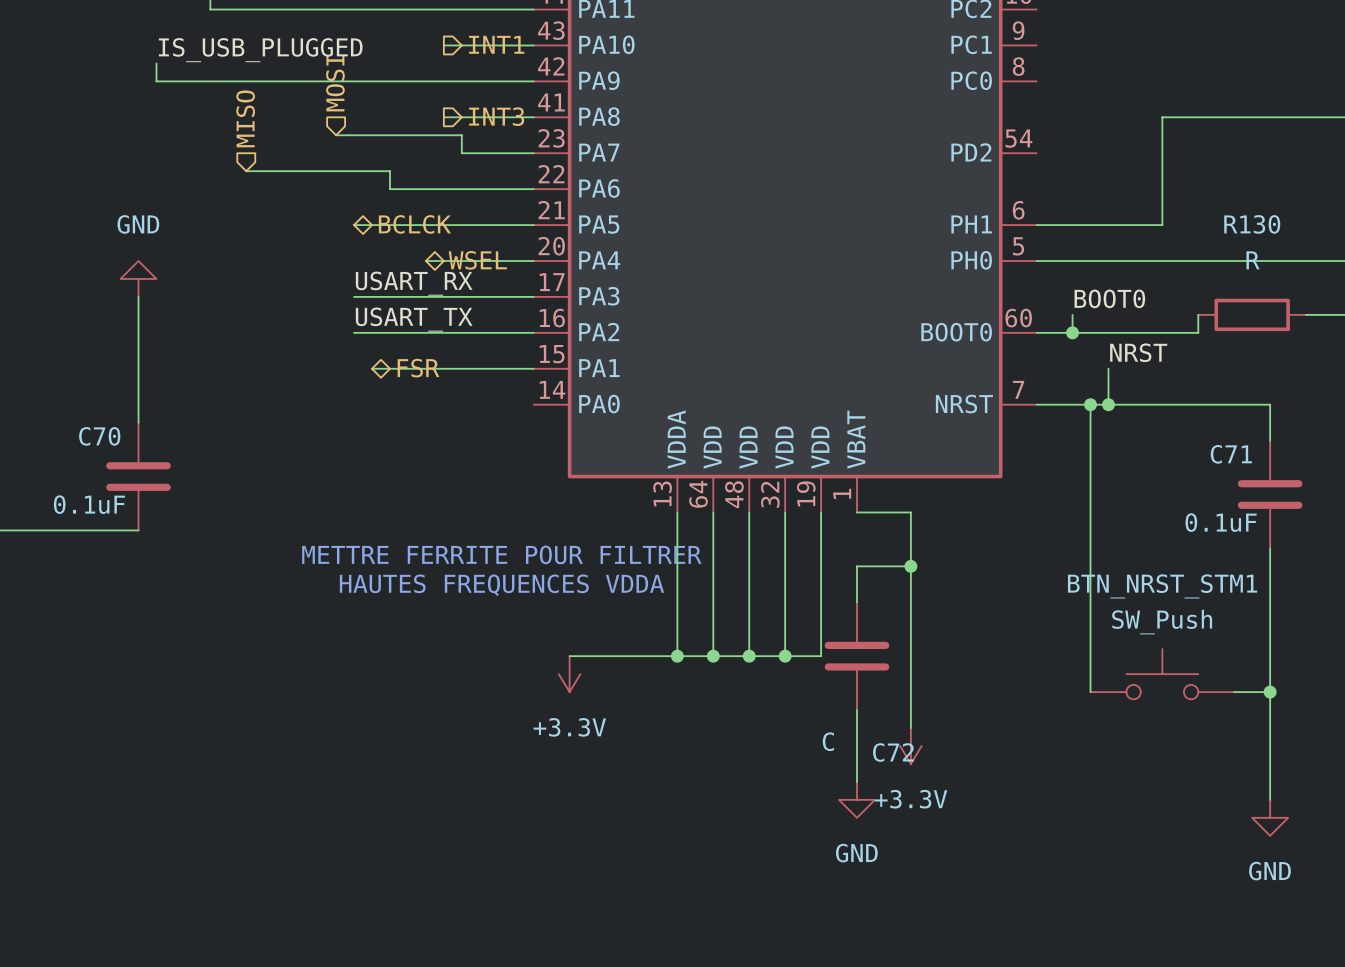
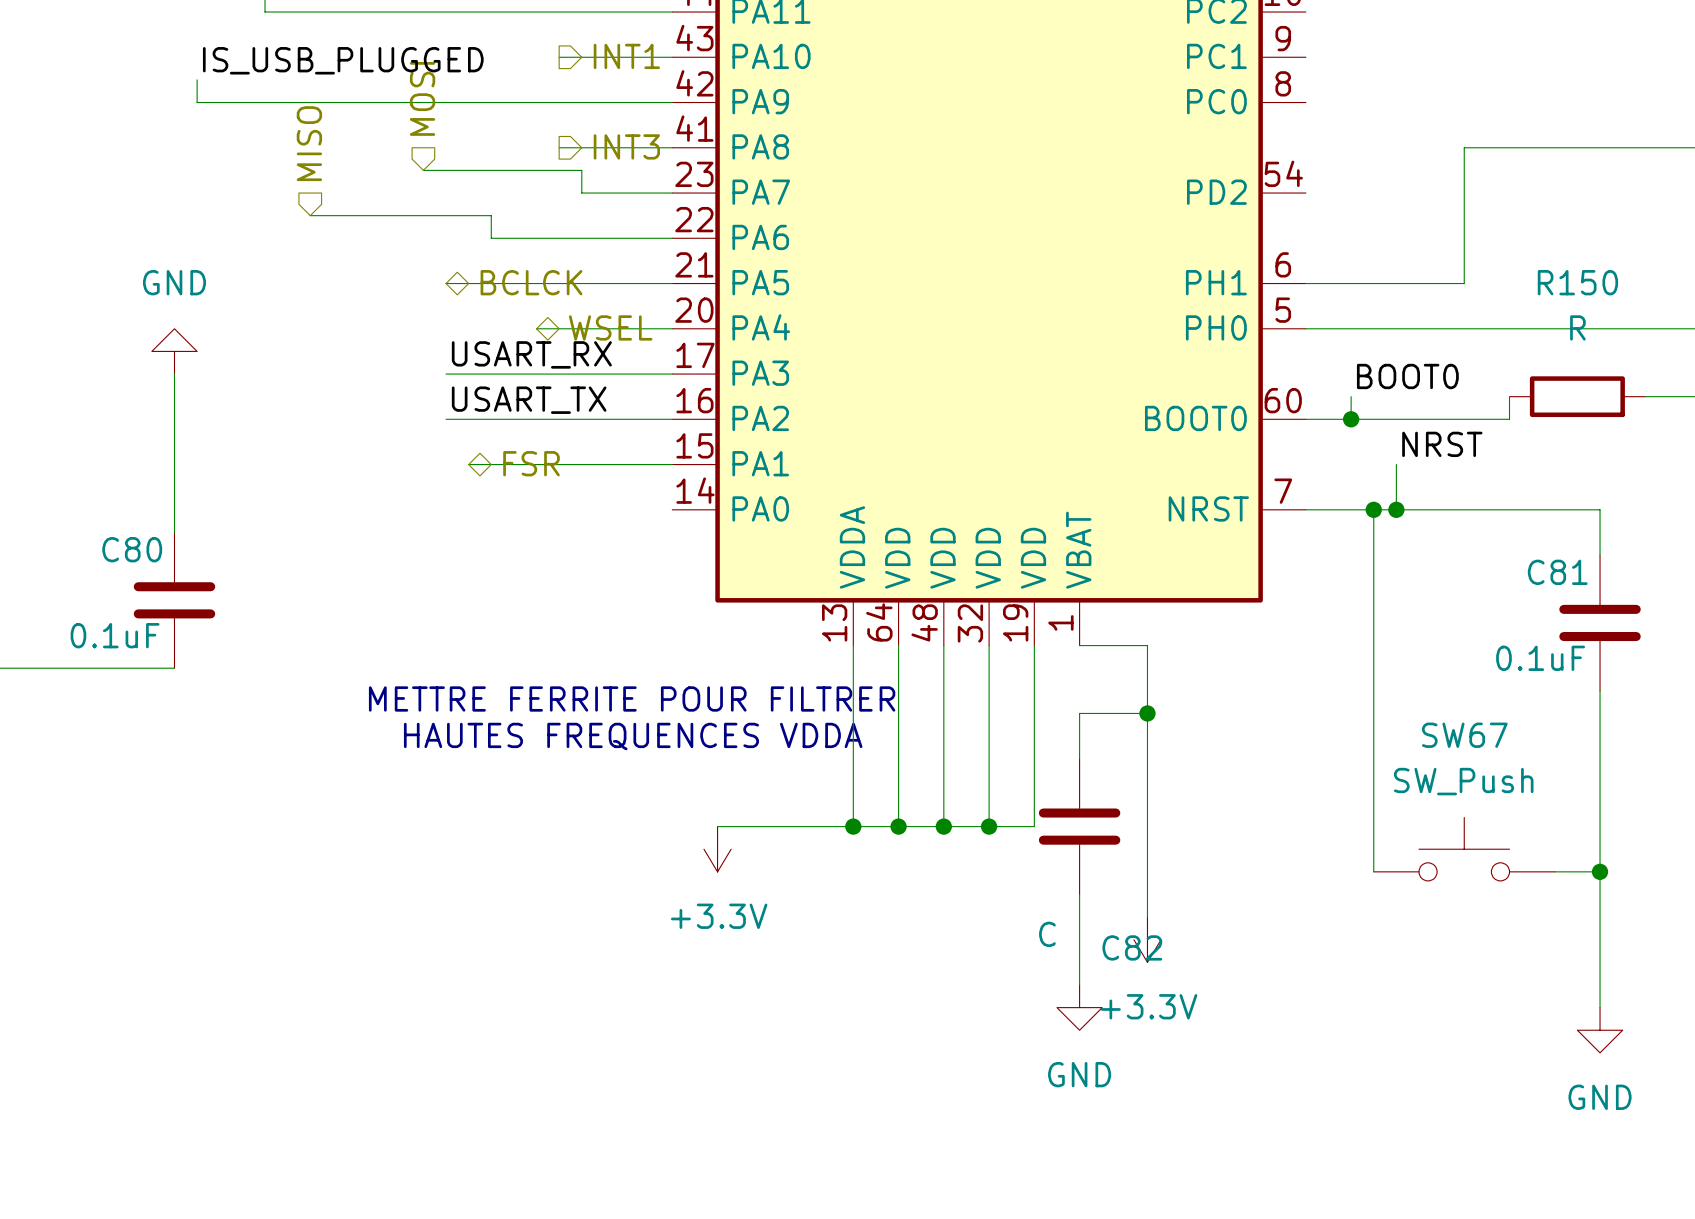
R130 name: R130 (1252, 224) -> R150 (1577, 282)
C70 name: C70 (99, 436) -> C80 (132, 549)
C71 name: C71 (1231, 454) -> C81 (1557, 572)
BTN_NRST_STM1 name: BTN_NRST_STM1 (1162, 586) -> SW67 (1464, 735)
C72 name: C72 (893, 752) -> C82 (1132, 947)

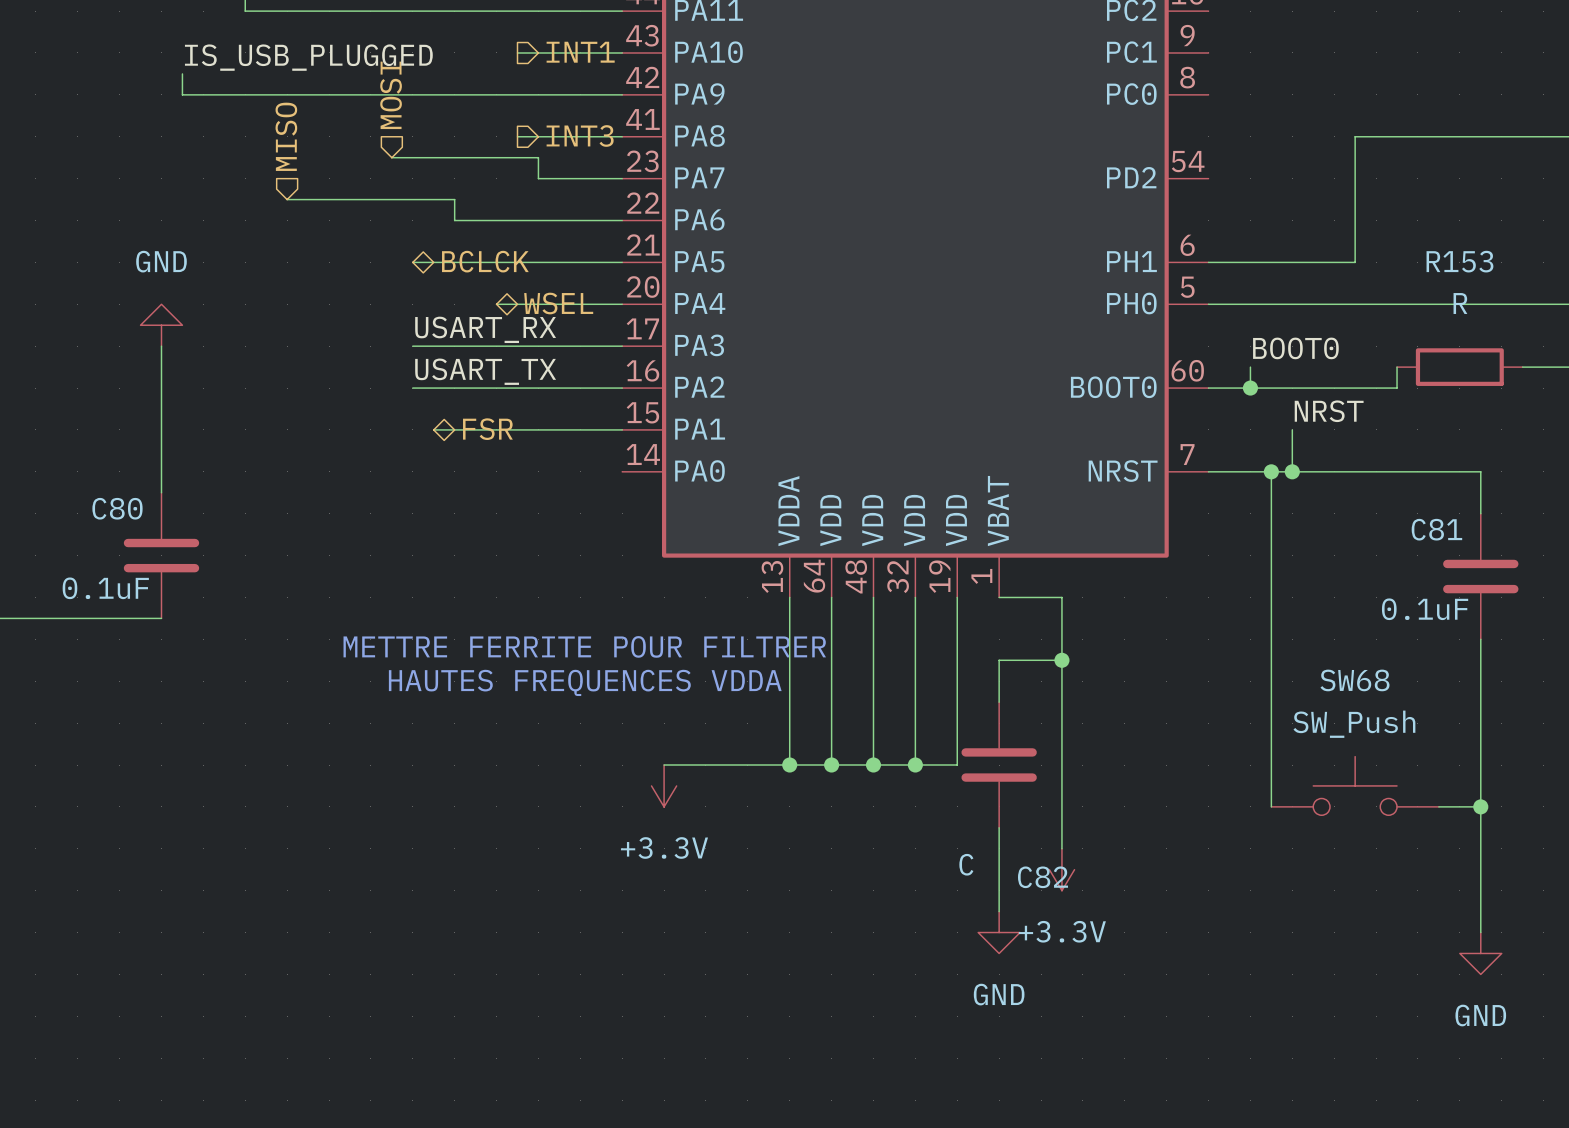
R150 name: R150 (1577, 282) -> R153 (1459, 261)
SW67 name: SW67 (1464, 735) -> SW68 (1354, 680)

